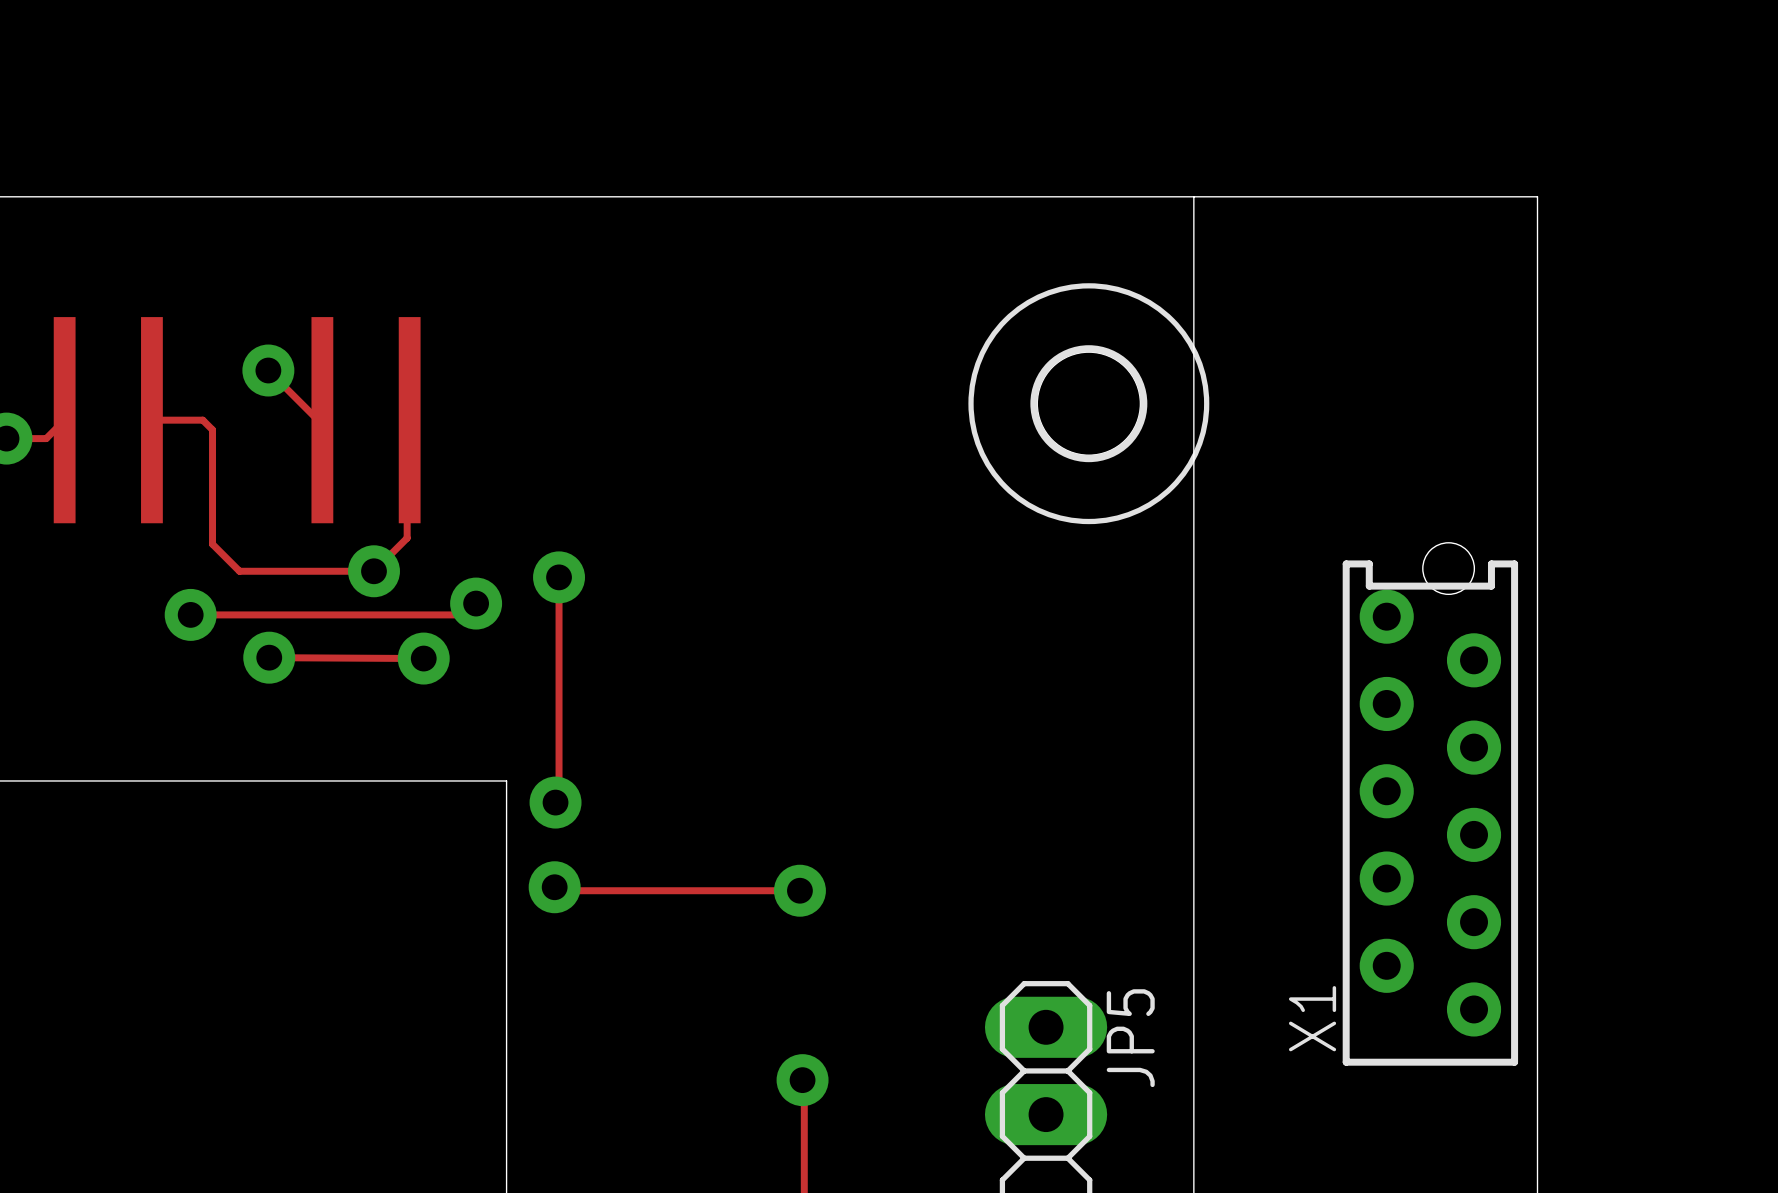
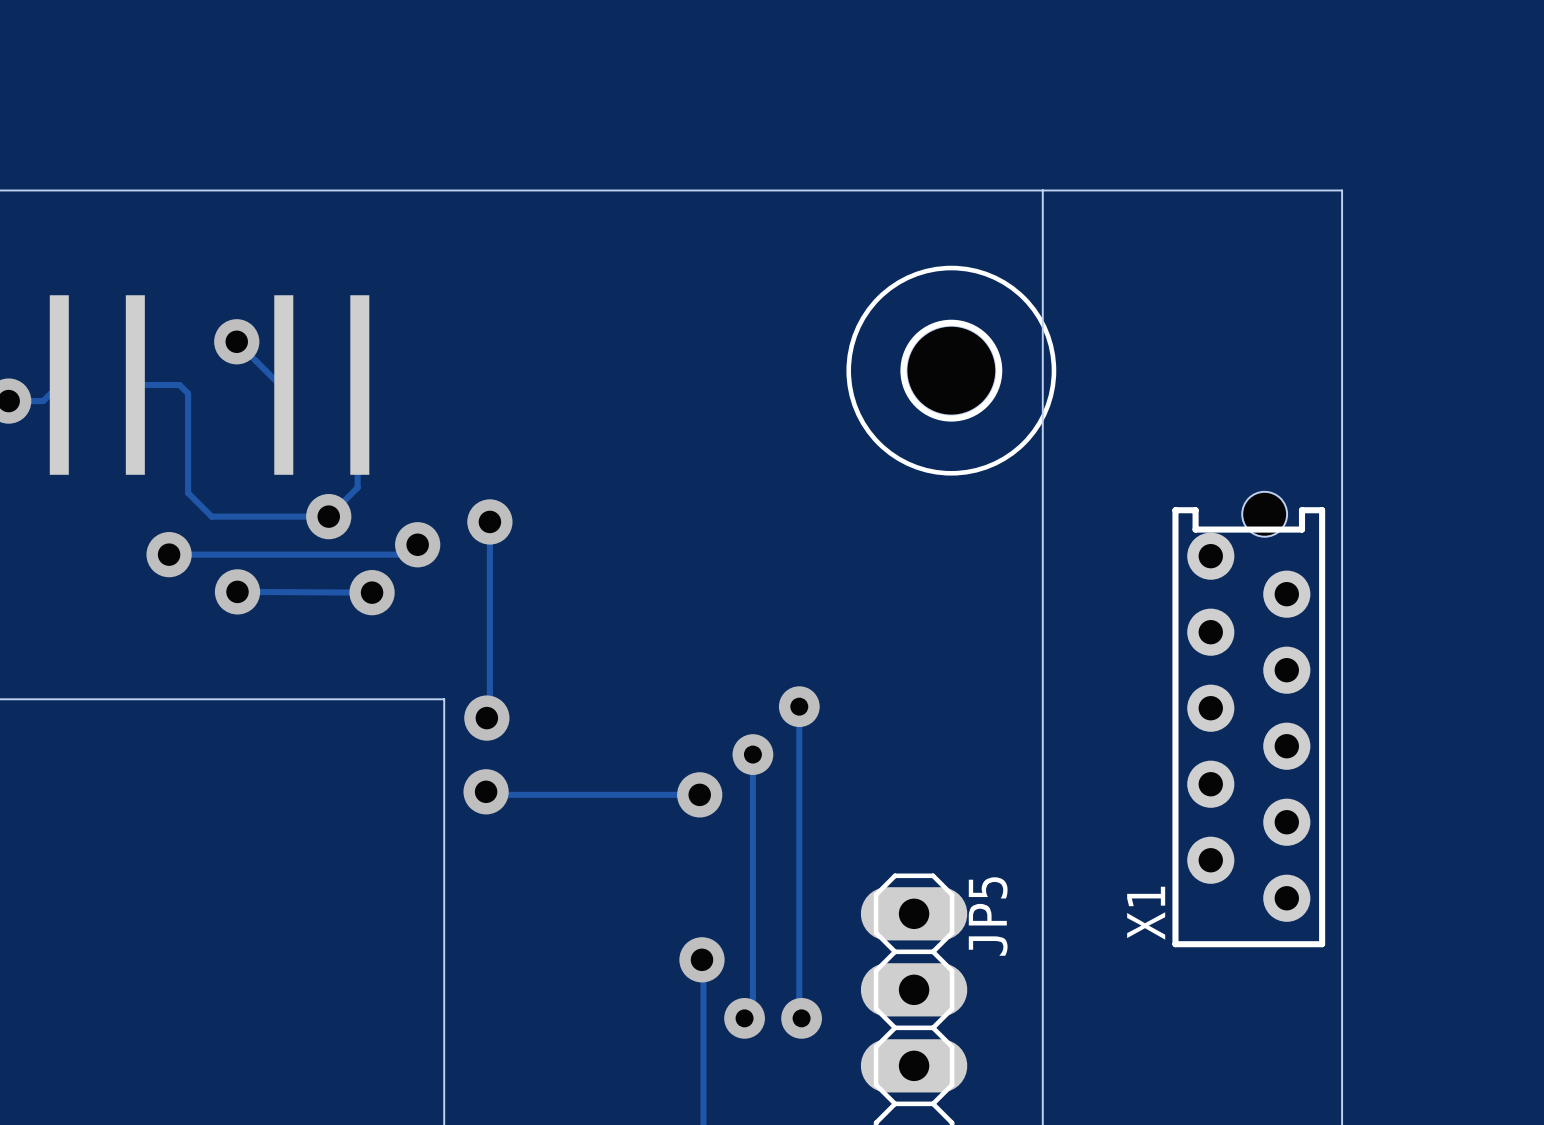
track: none -> (799, 706) (799, 1016) (801, 1018)
via: none -> (799, 706)
track: none -> (752, 754) (752, 1009) (744, 1018)
via: none -> (752, 754)
via: none -> (744, 1018)
via: none -> (801, 1018)

